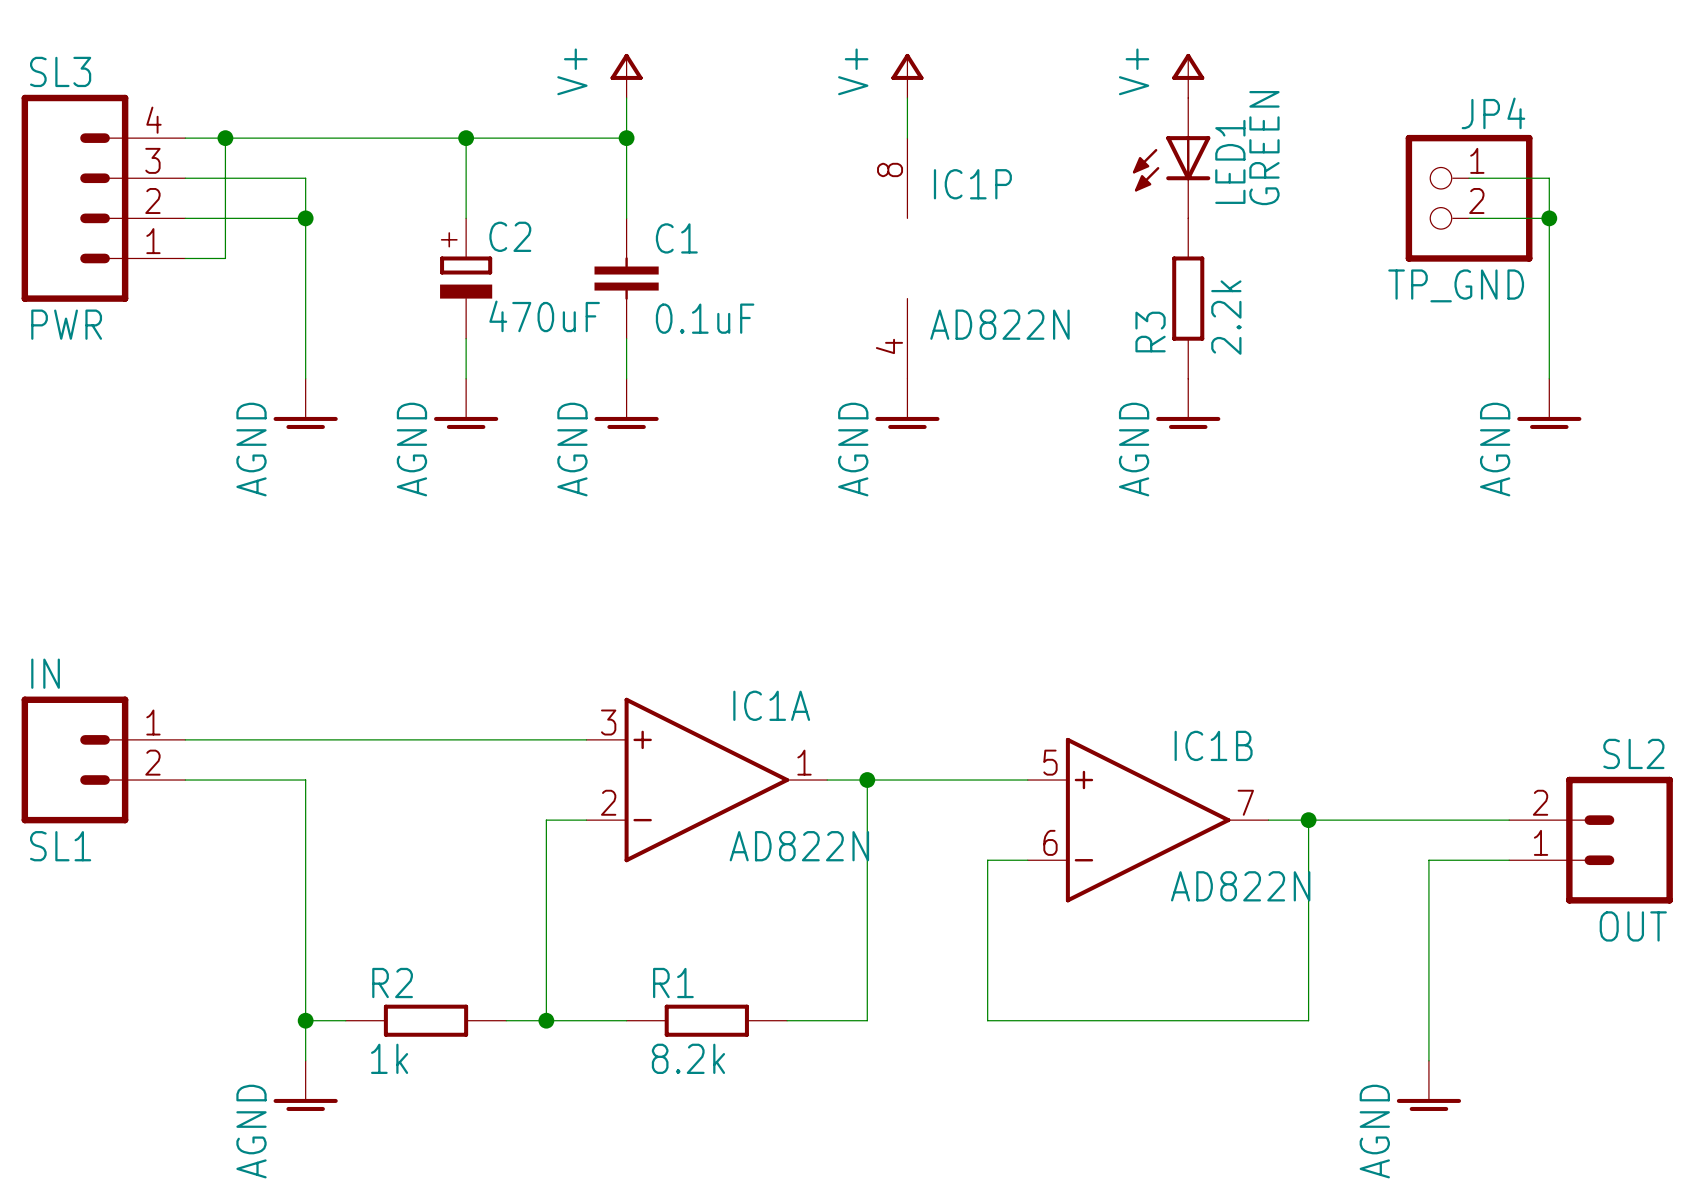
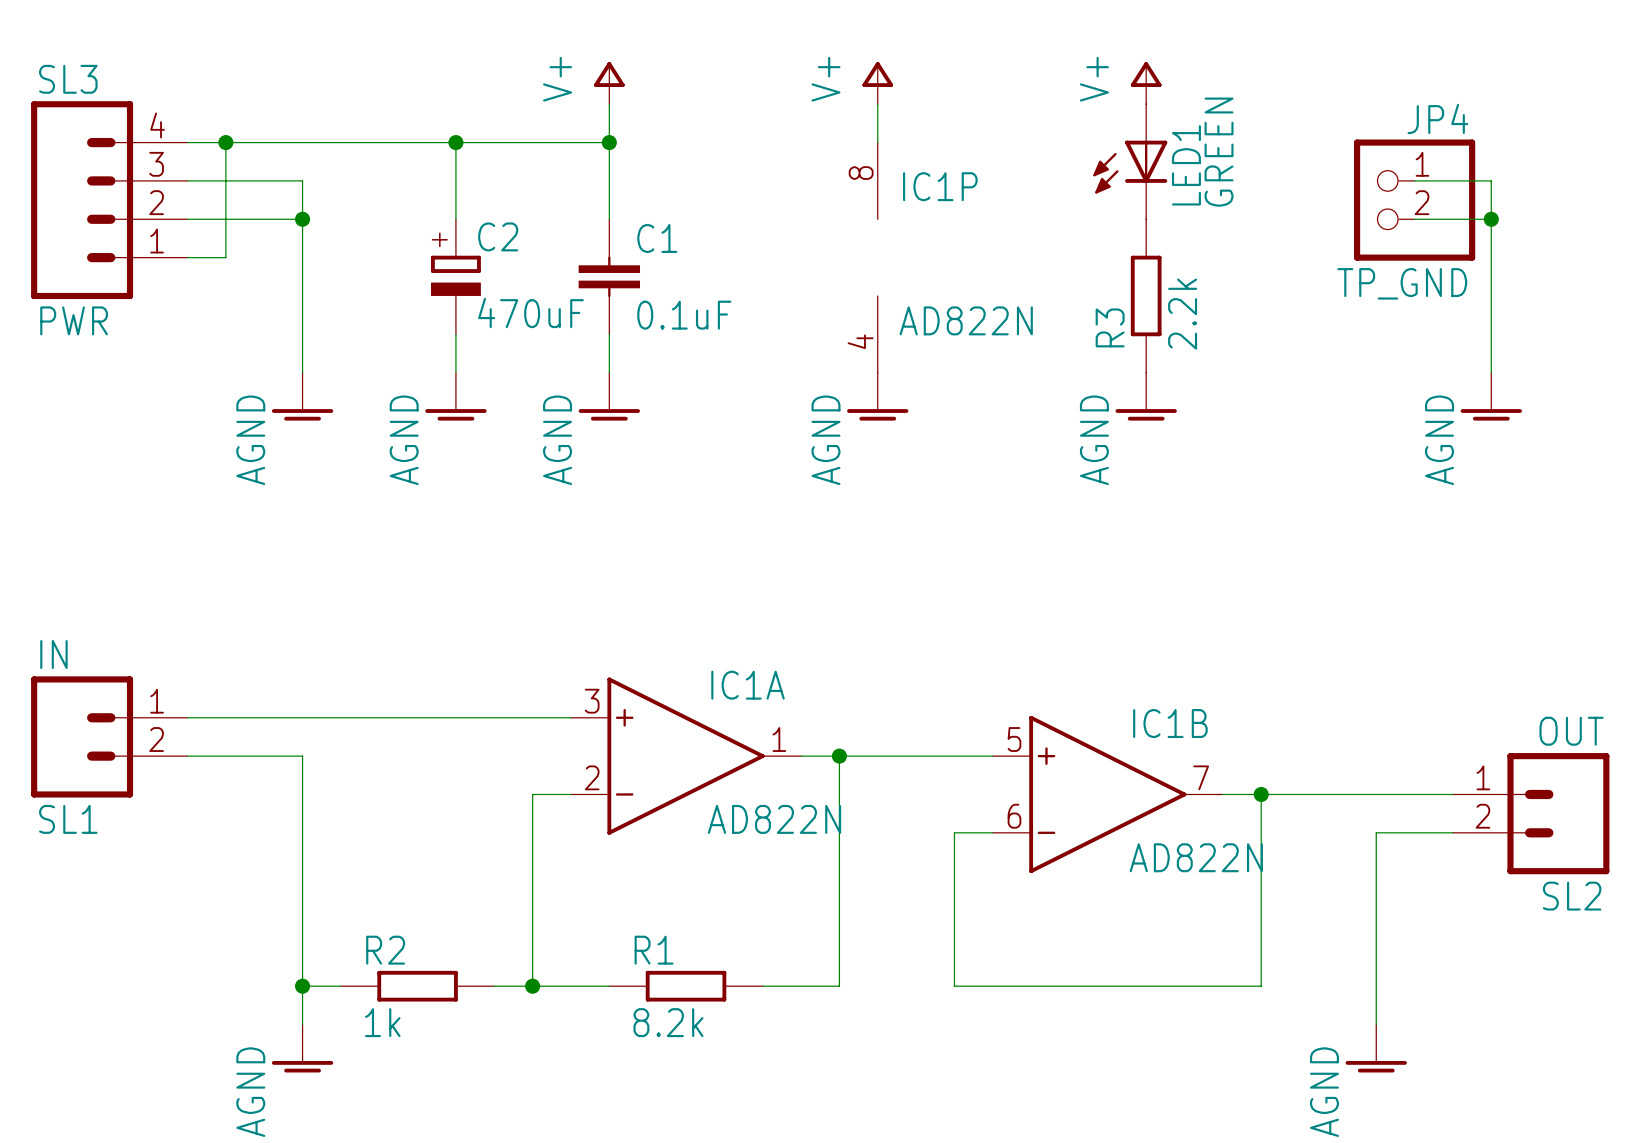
SL2 flip: as is (1619, 840) -> up-down (1558, 813)

